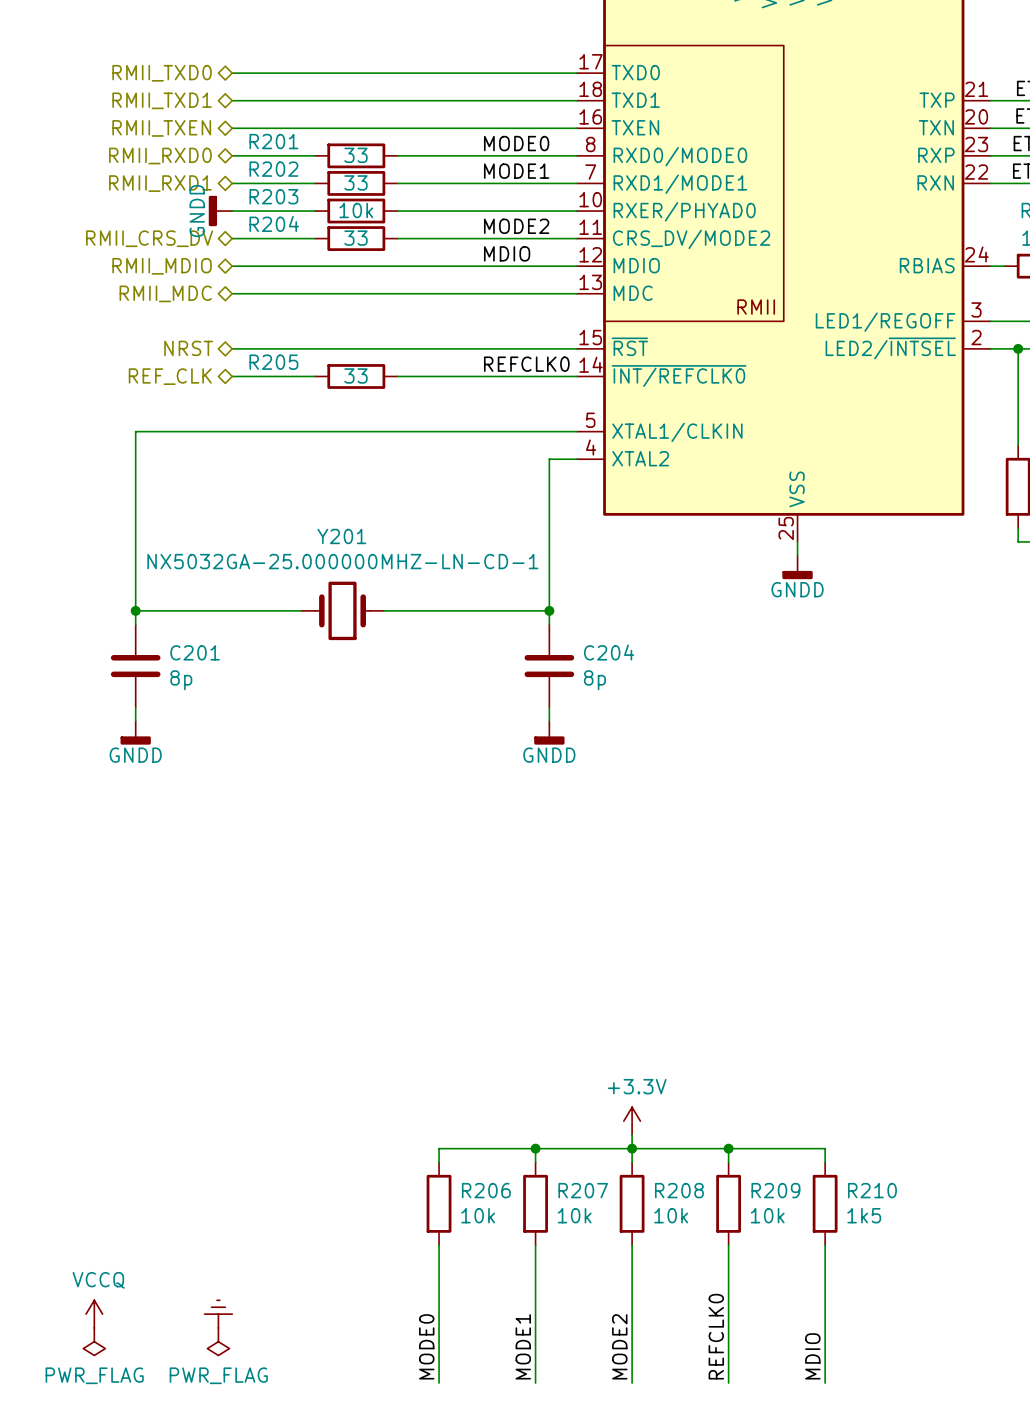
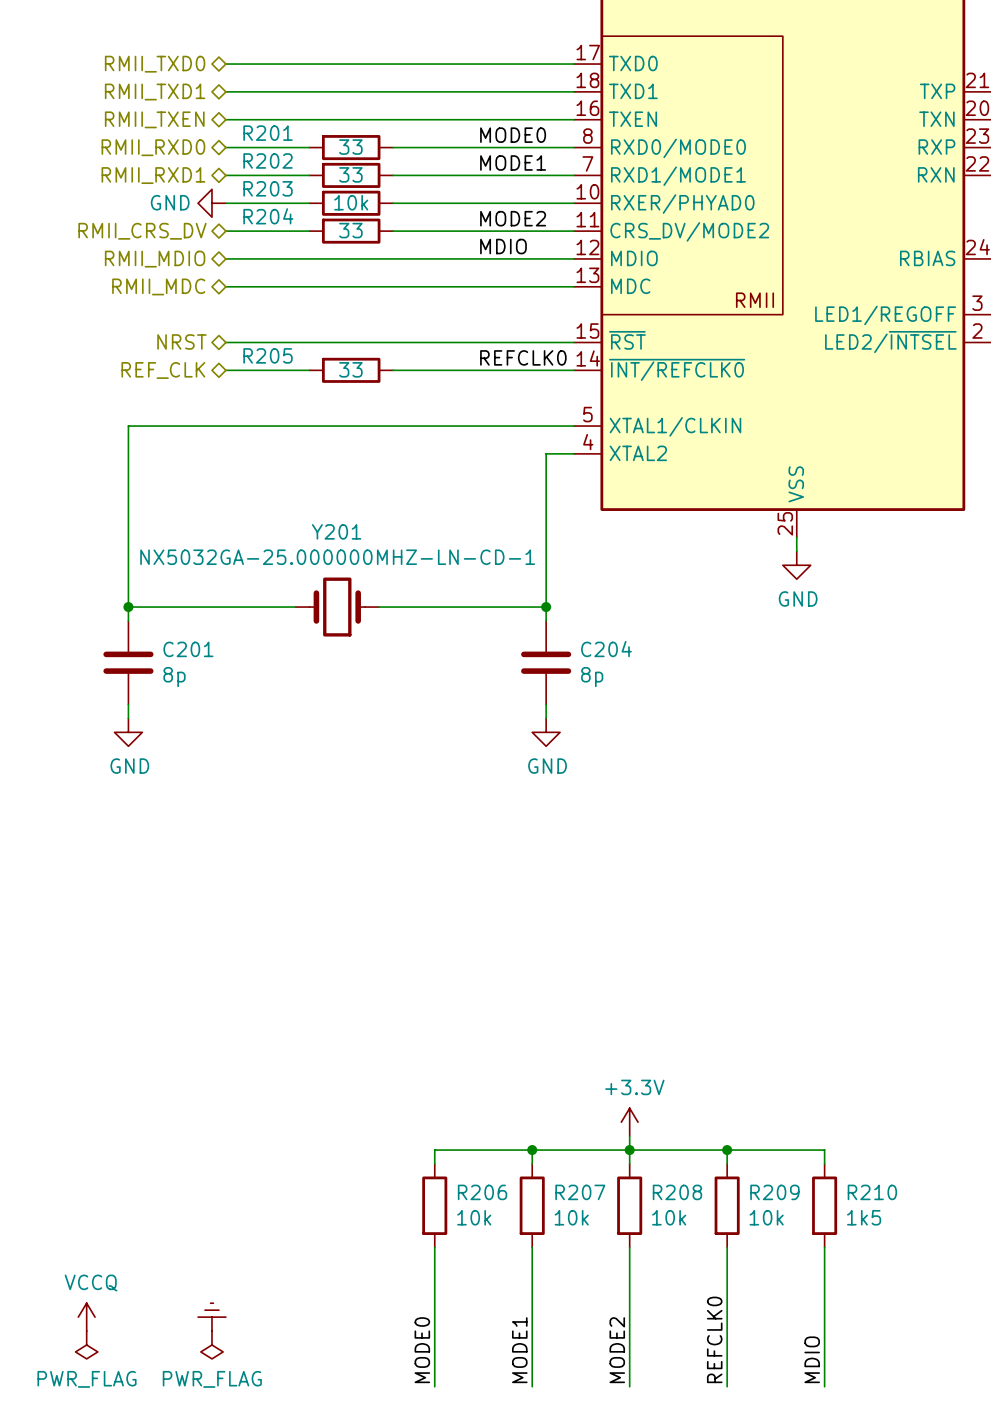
power symbol: GNDD (220, 211) -> GND (211, 203)
power symbol: GNDD (797, 567) -> GND (796, 565)
power symbol: GNDD (135, 732) -> GND (128, 732)
power symbol: GNDD (549, 732) -> GND (546, 732)

